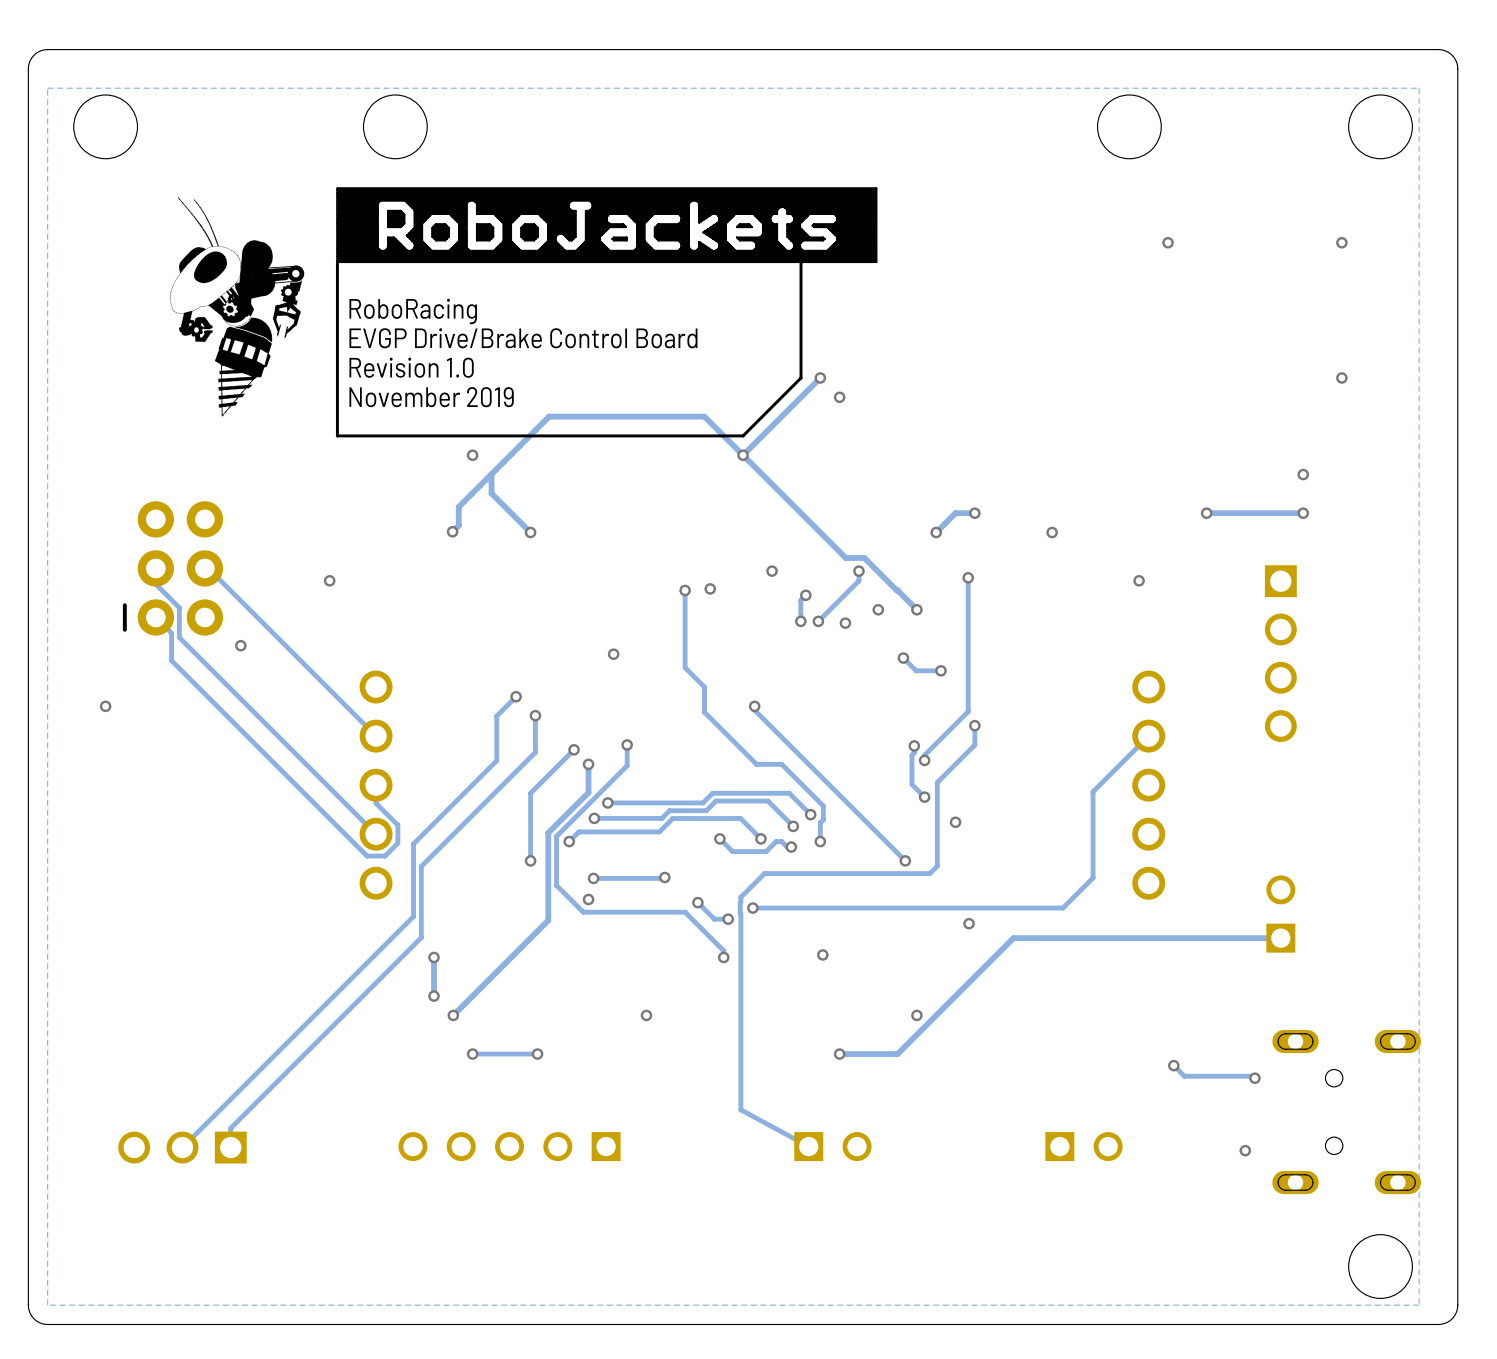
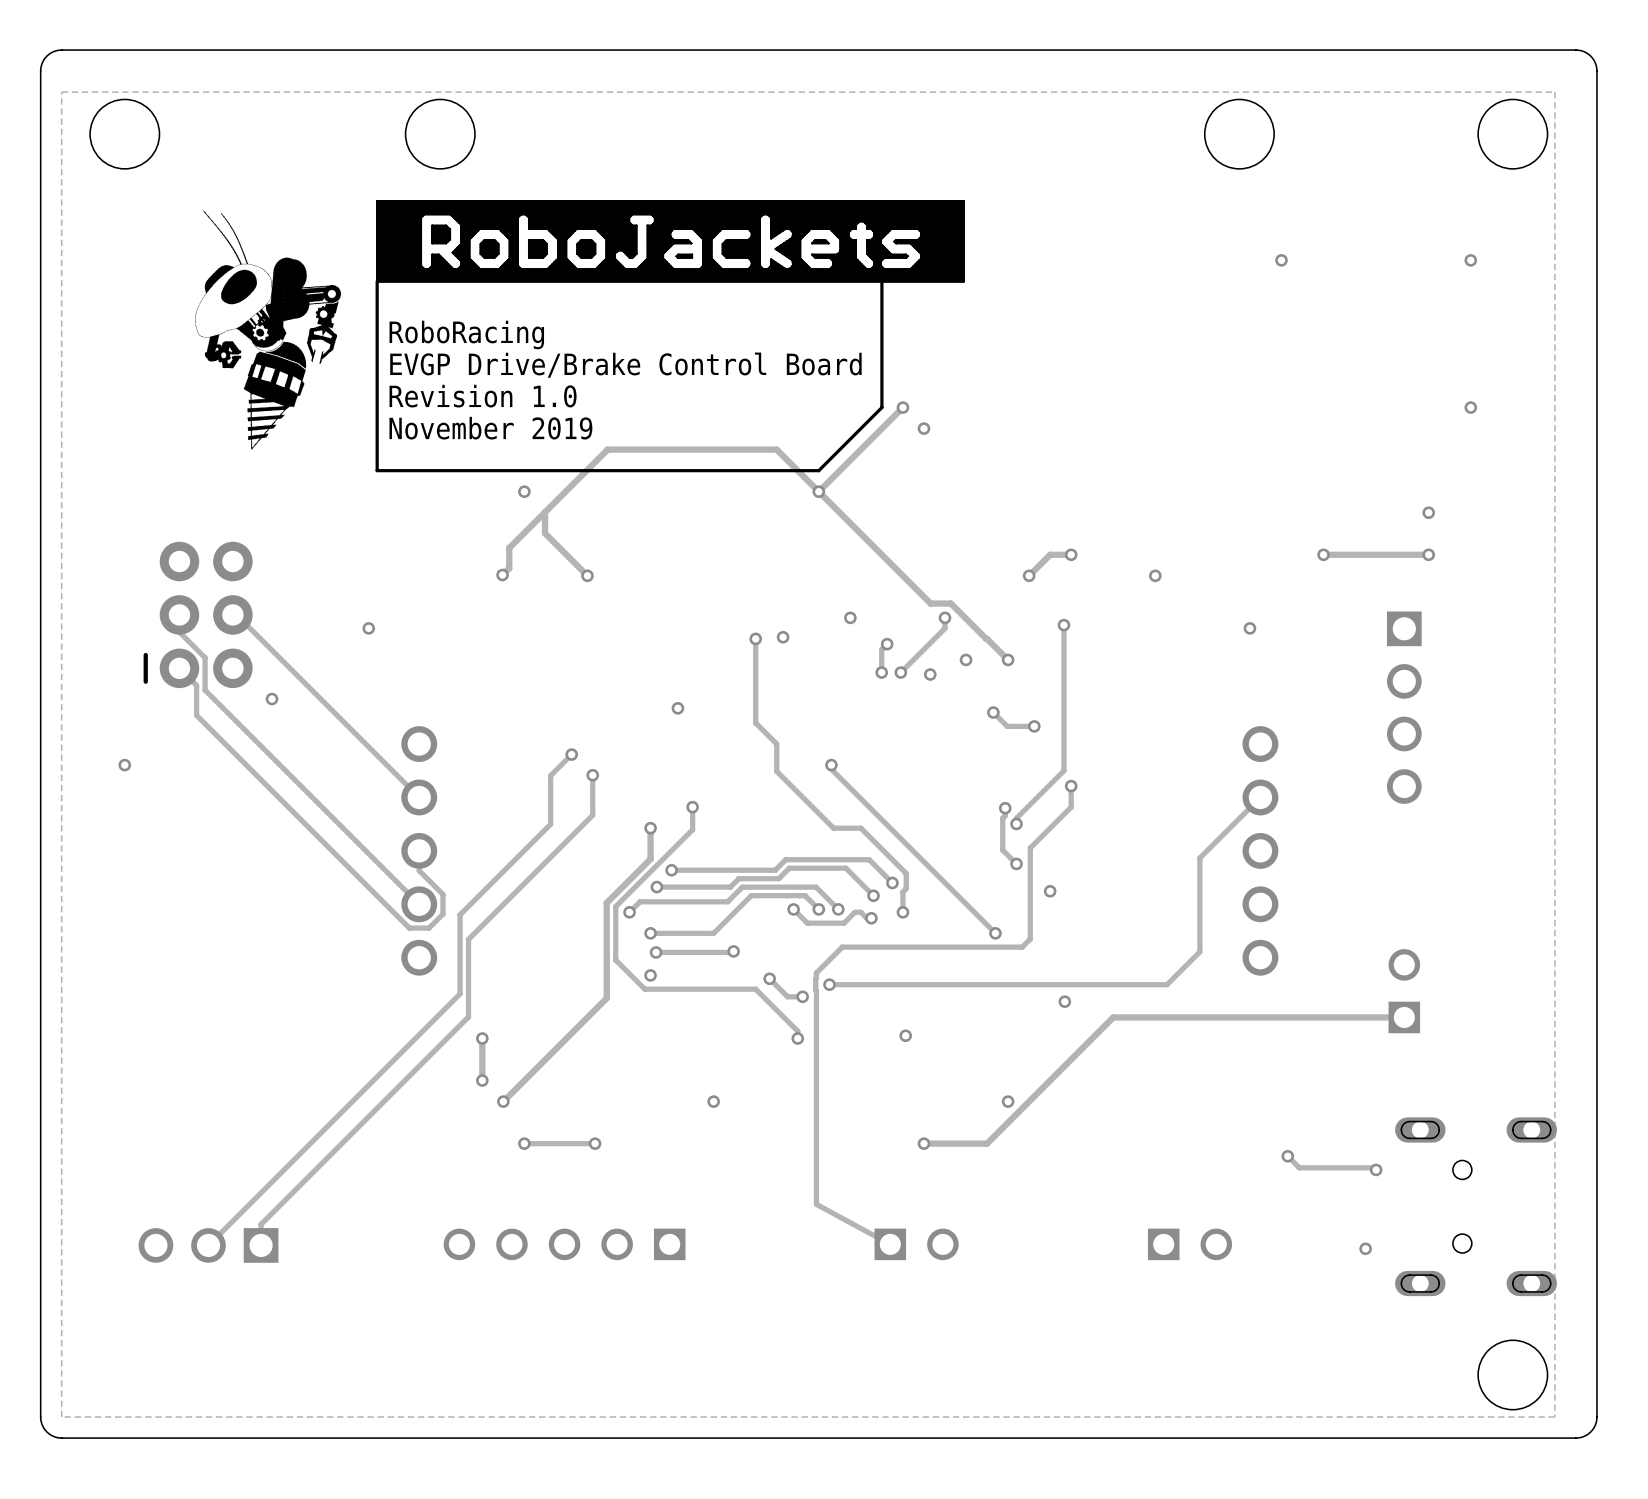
track: (574, 749) (530, 793) (530, 860) -> none
via: (574, 749) -> none
track: none -> (818, 909) (805, 895) (751, 895) (713, 933) (650, 933)
via: none -> (818, 909)
via: (530, 860) -> none
via: none -> (650, 933)

